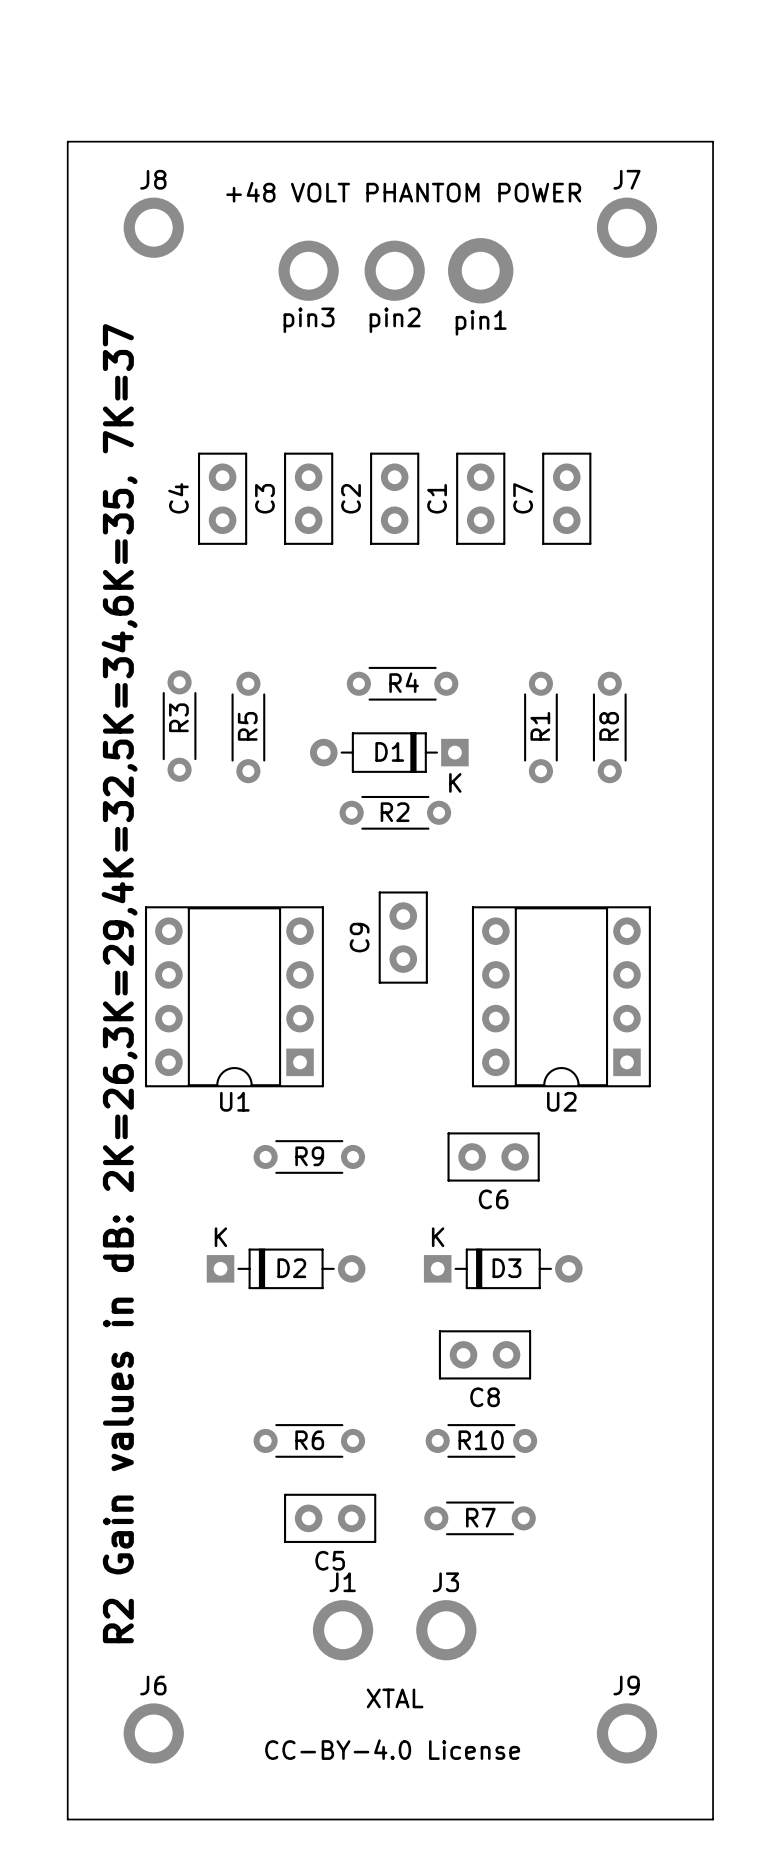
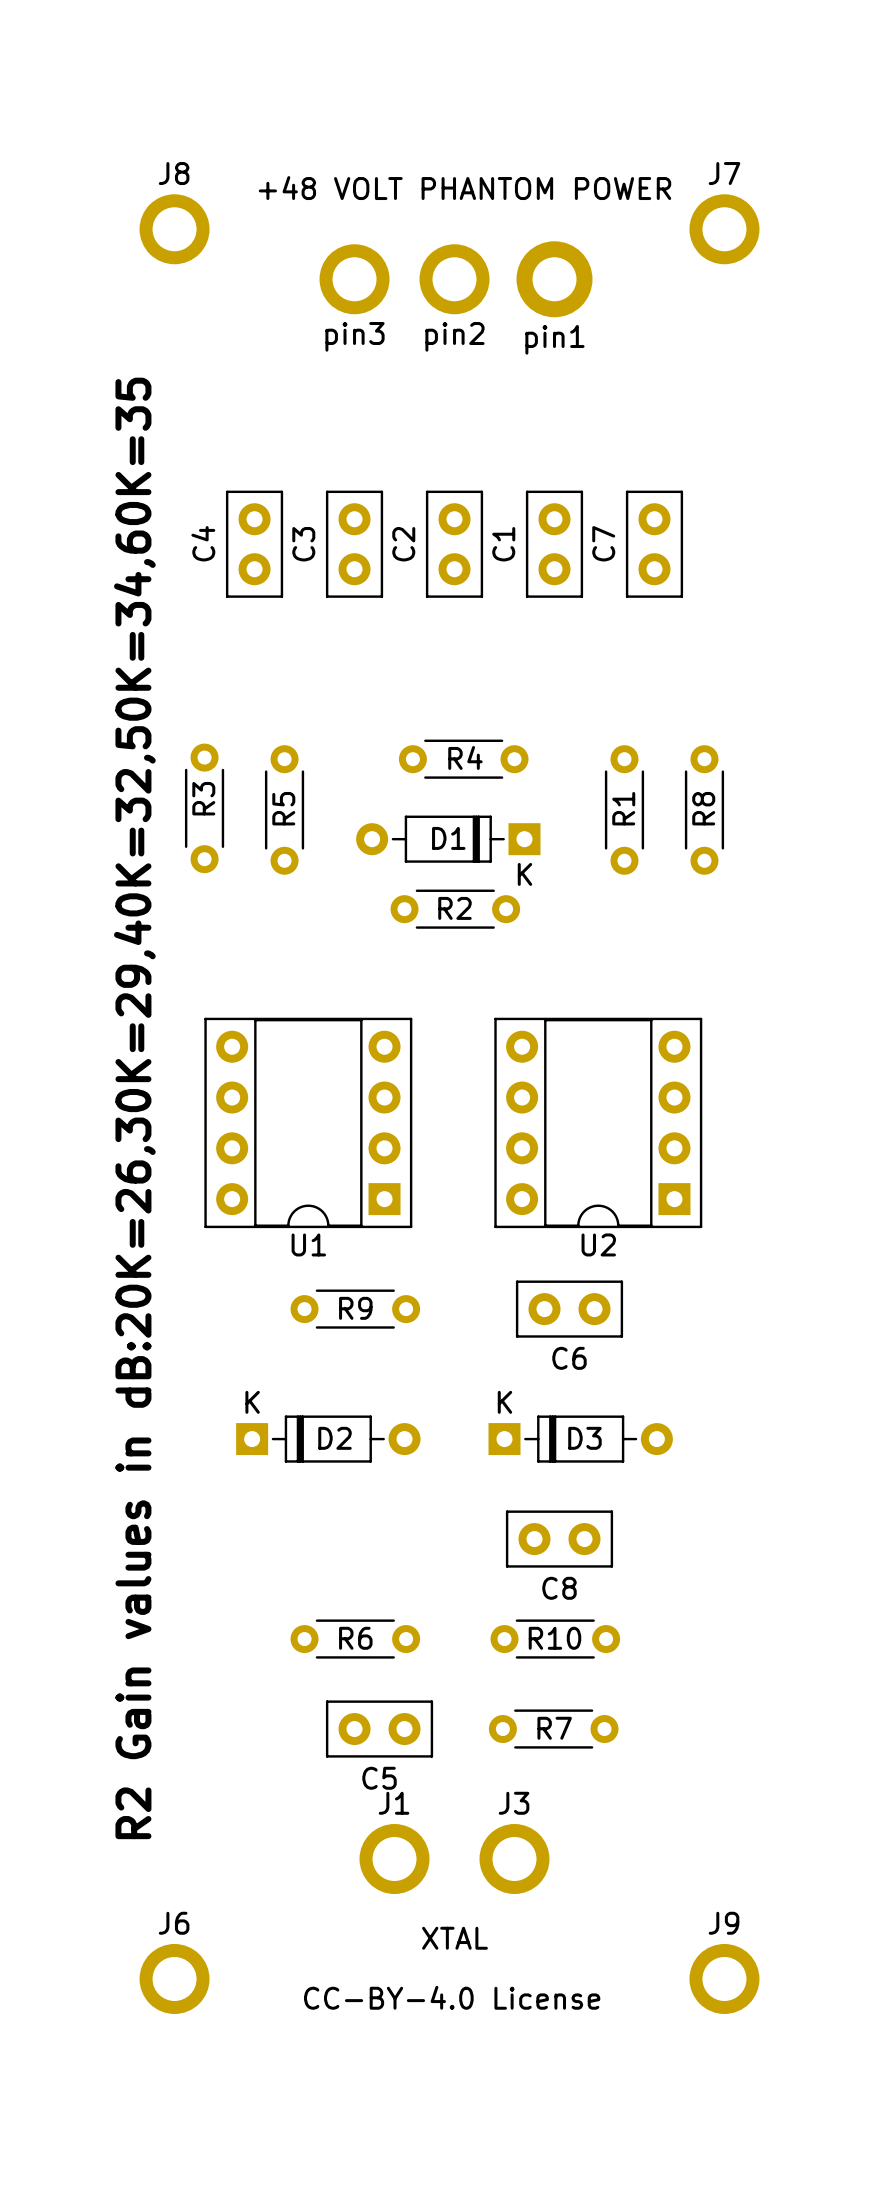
board edge: (67, 141) (67, 1819) (713, 1819) (713, 141) (67, 141) -> none
C9: (403, 937) -> none
text: R2 Gain values in dB: 2K=26,3K=29,4K=32,5K=34,6K=35, 7K=37 (119, 983) -> R2 Gain values in dB:20K=26,30K=29,40K=32,50K=34,60K=35 (134, 1108)
U1 position: (234, 996) -> (308, 1122)
U2 position: (561, 996) -> (598, 1122)

